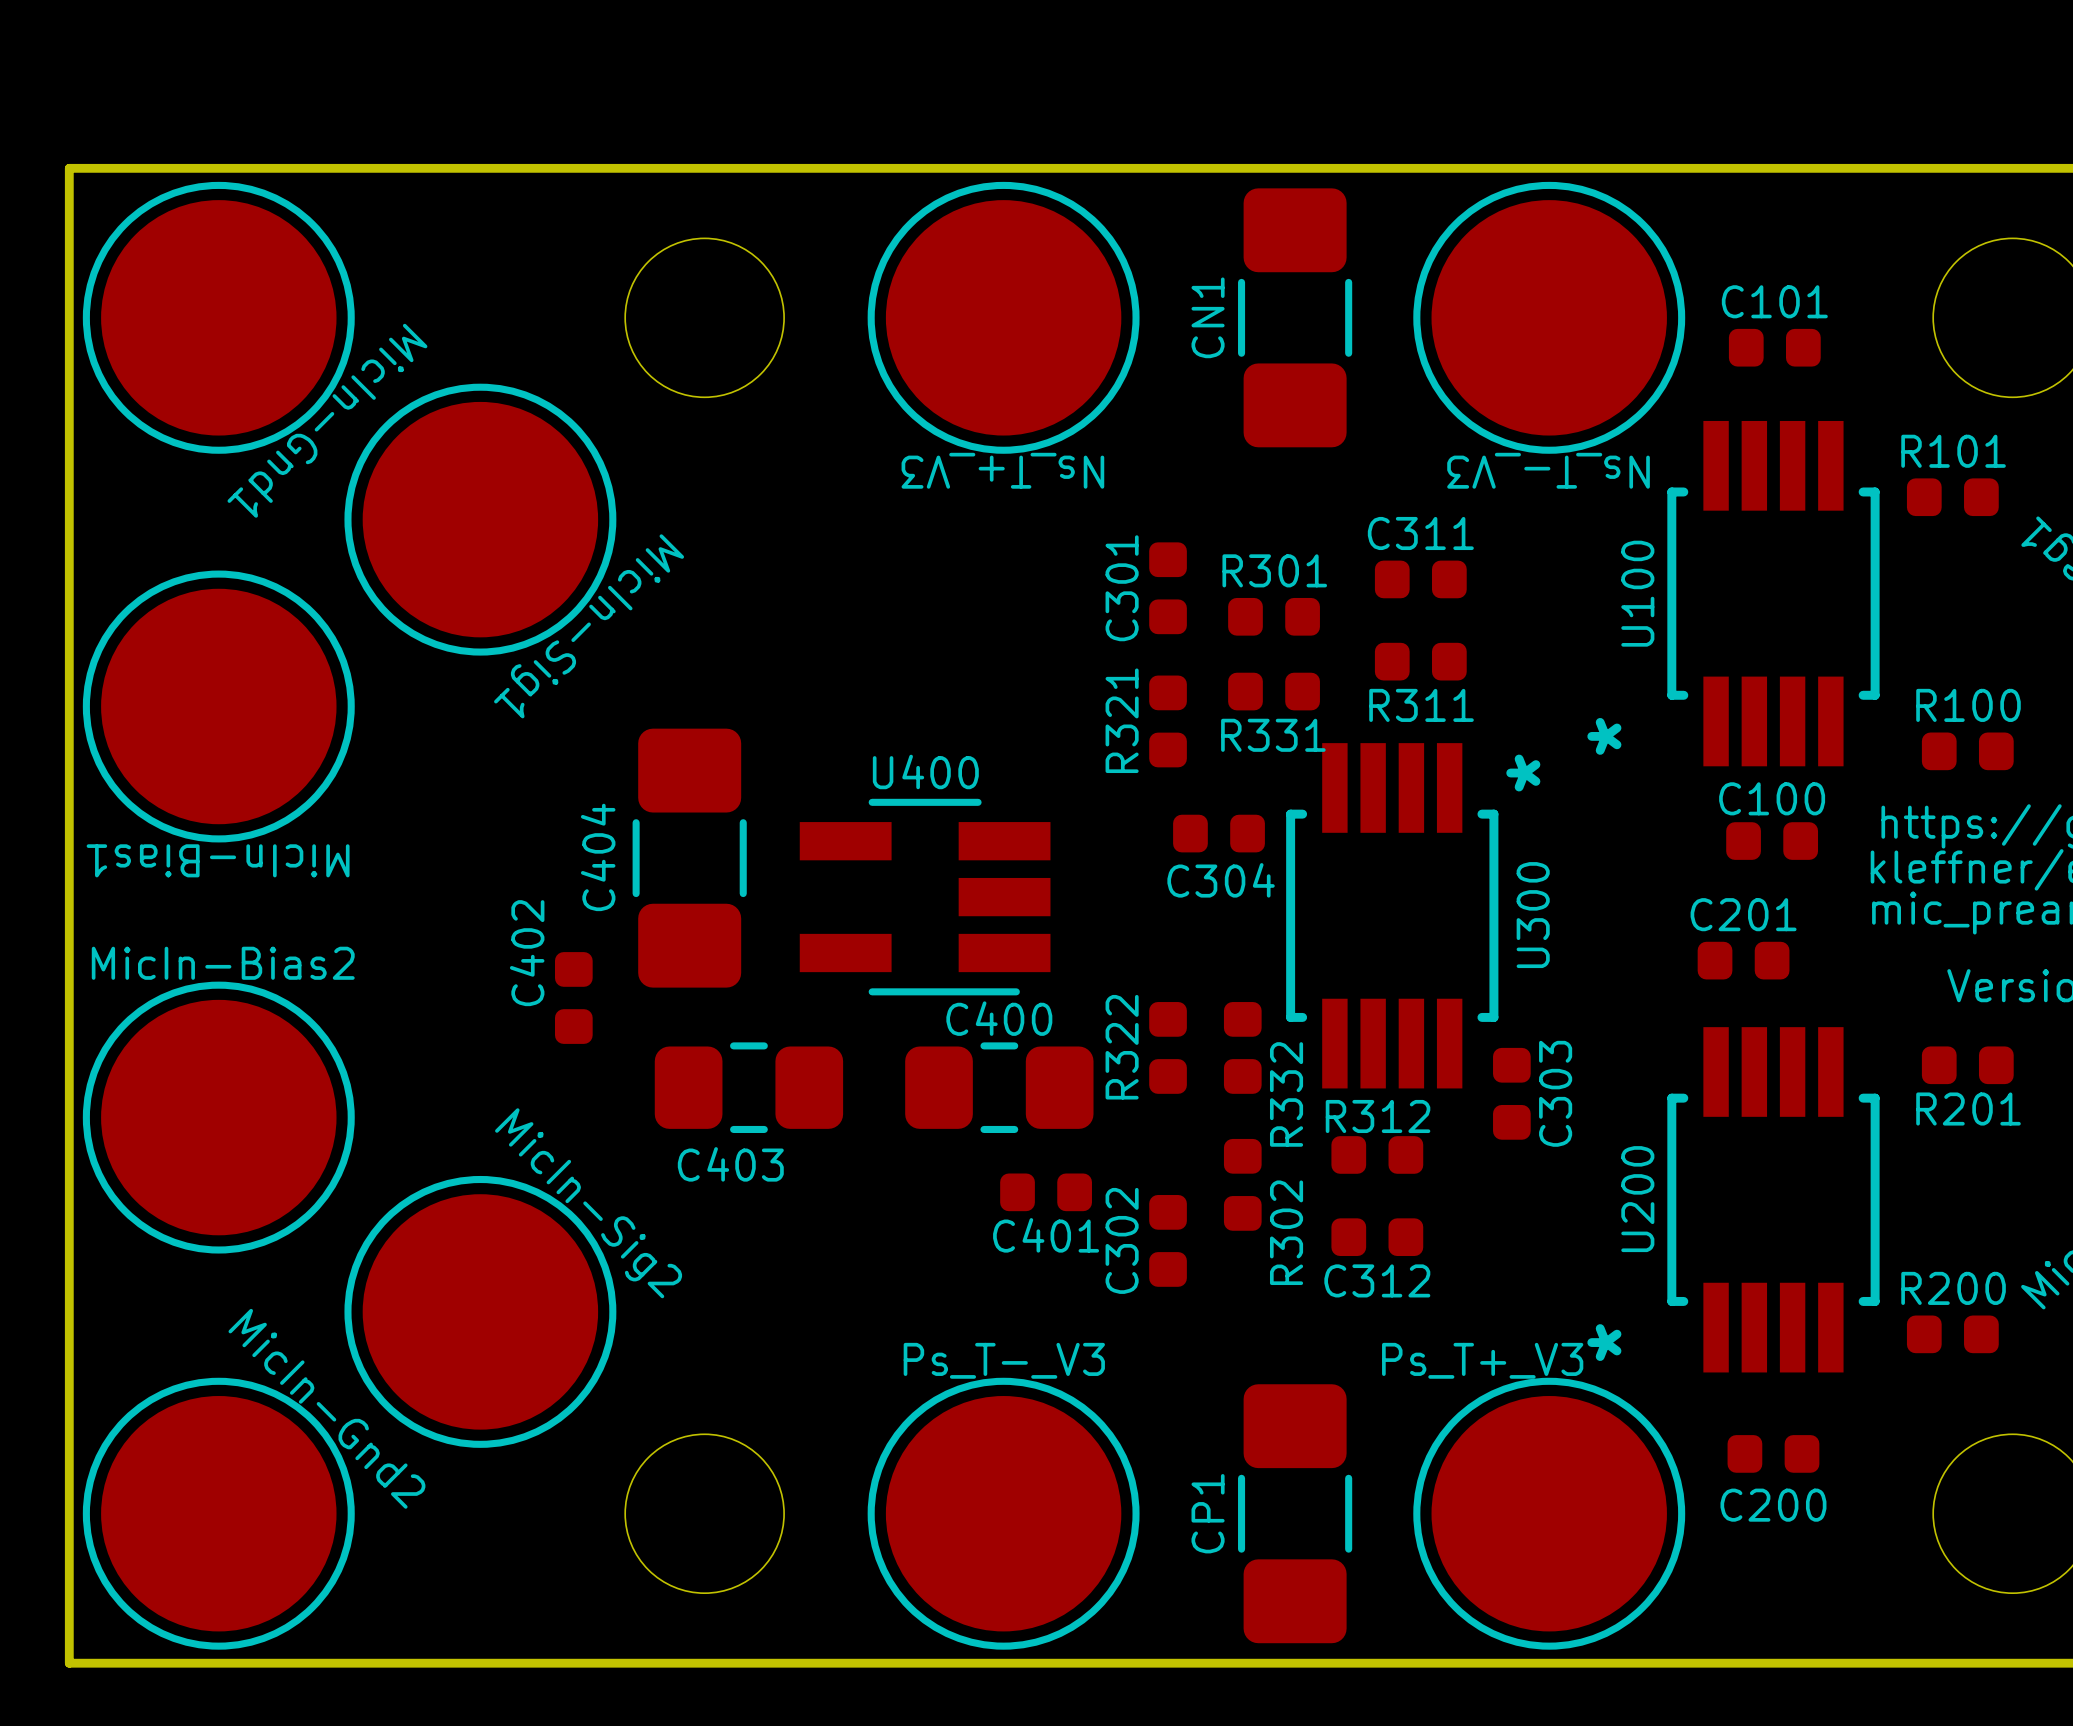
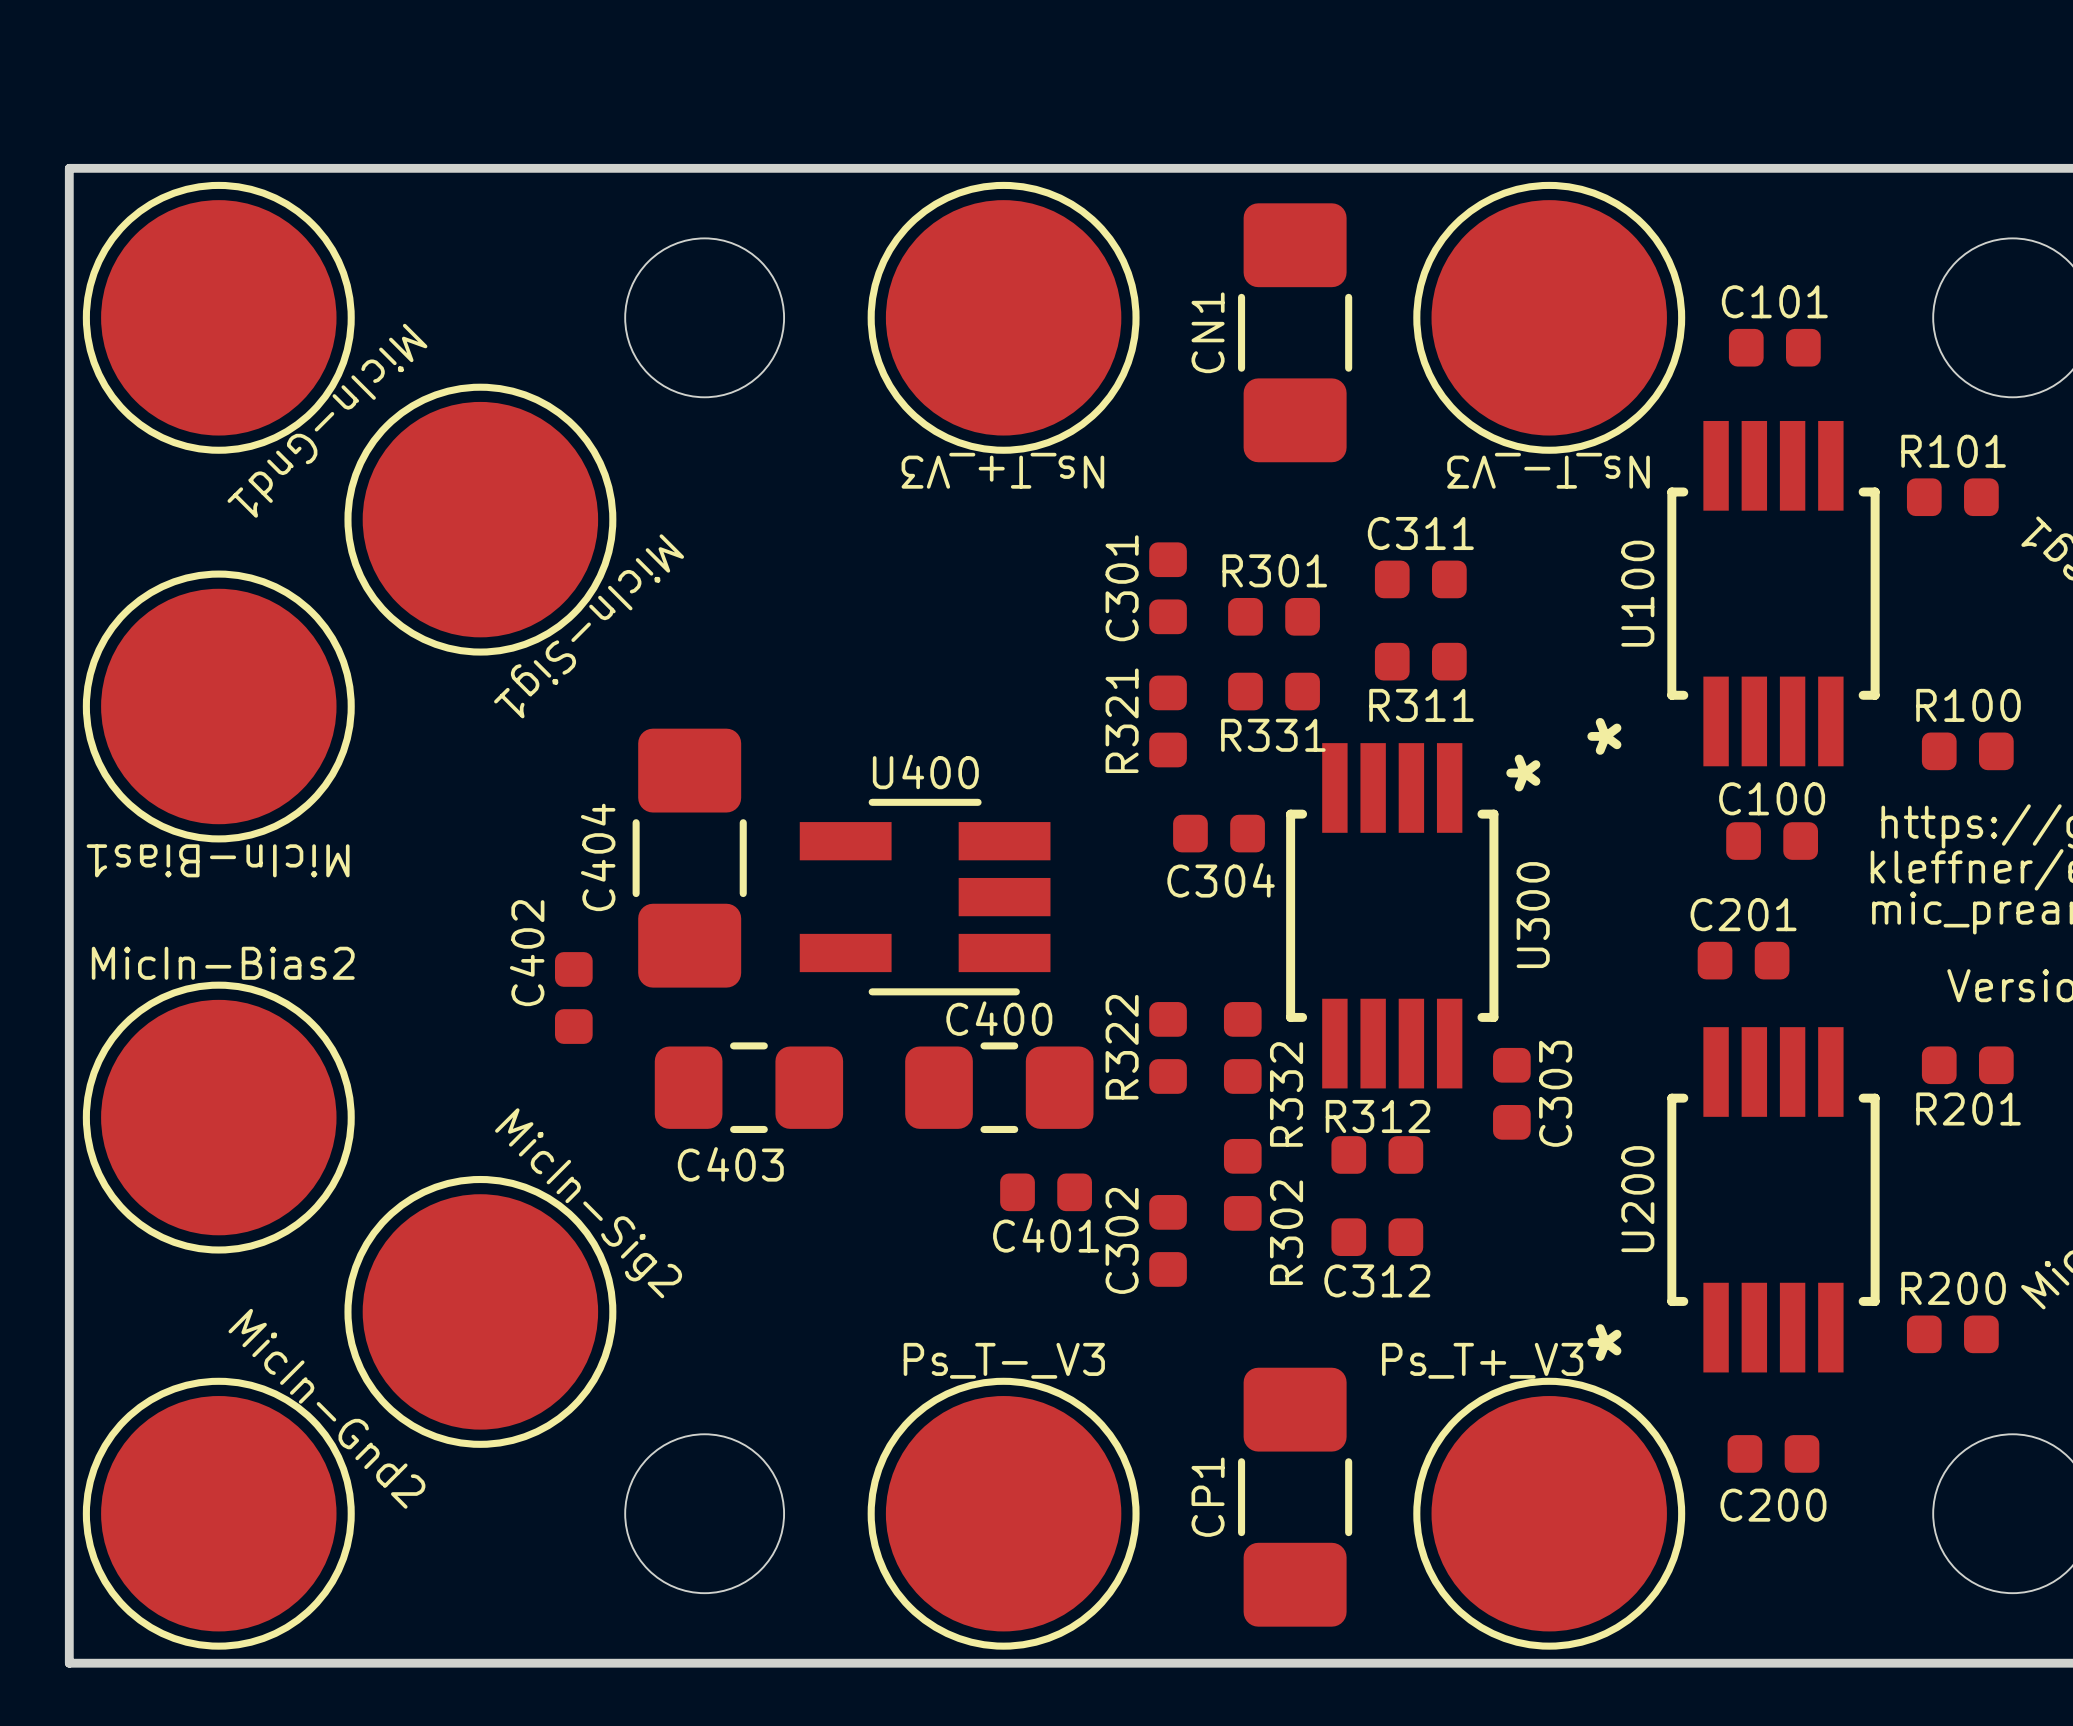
CN1 position: (1295, 317) -> (1295, 332)
CP1 position: (1295, 1513) -> (1295, 1497)

